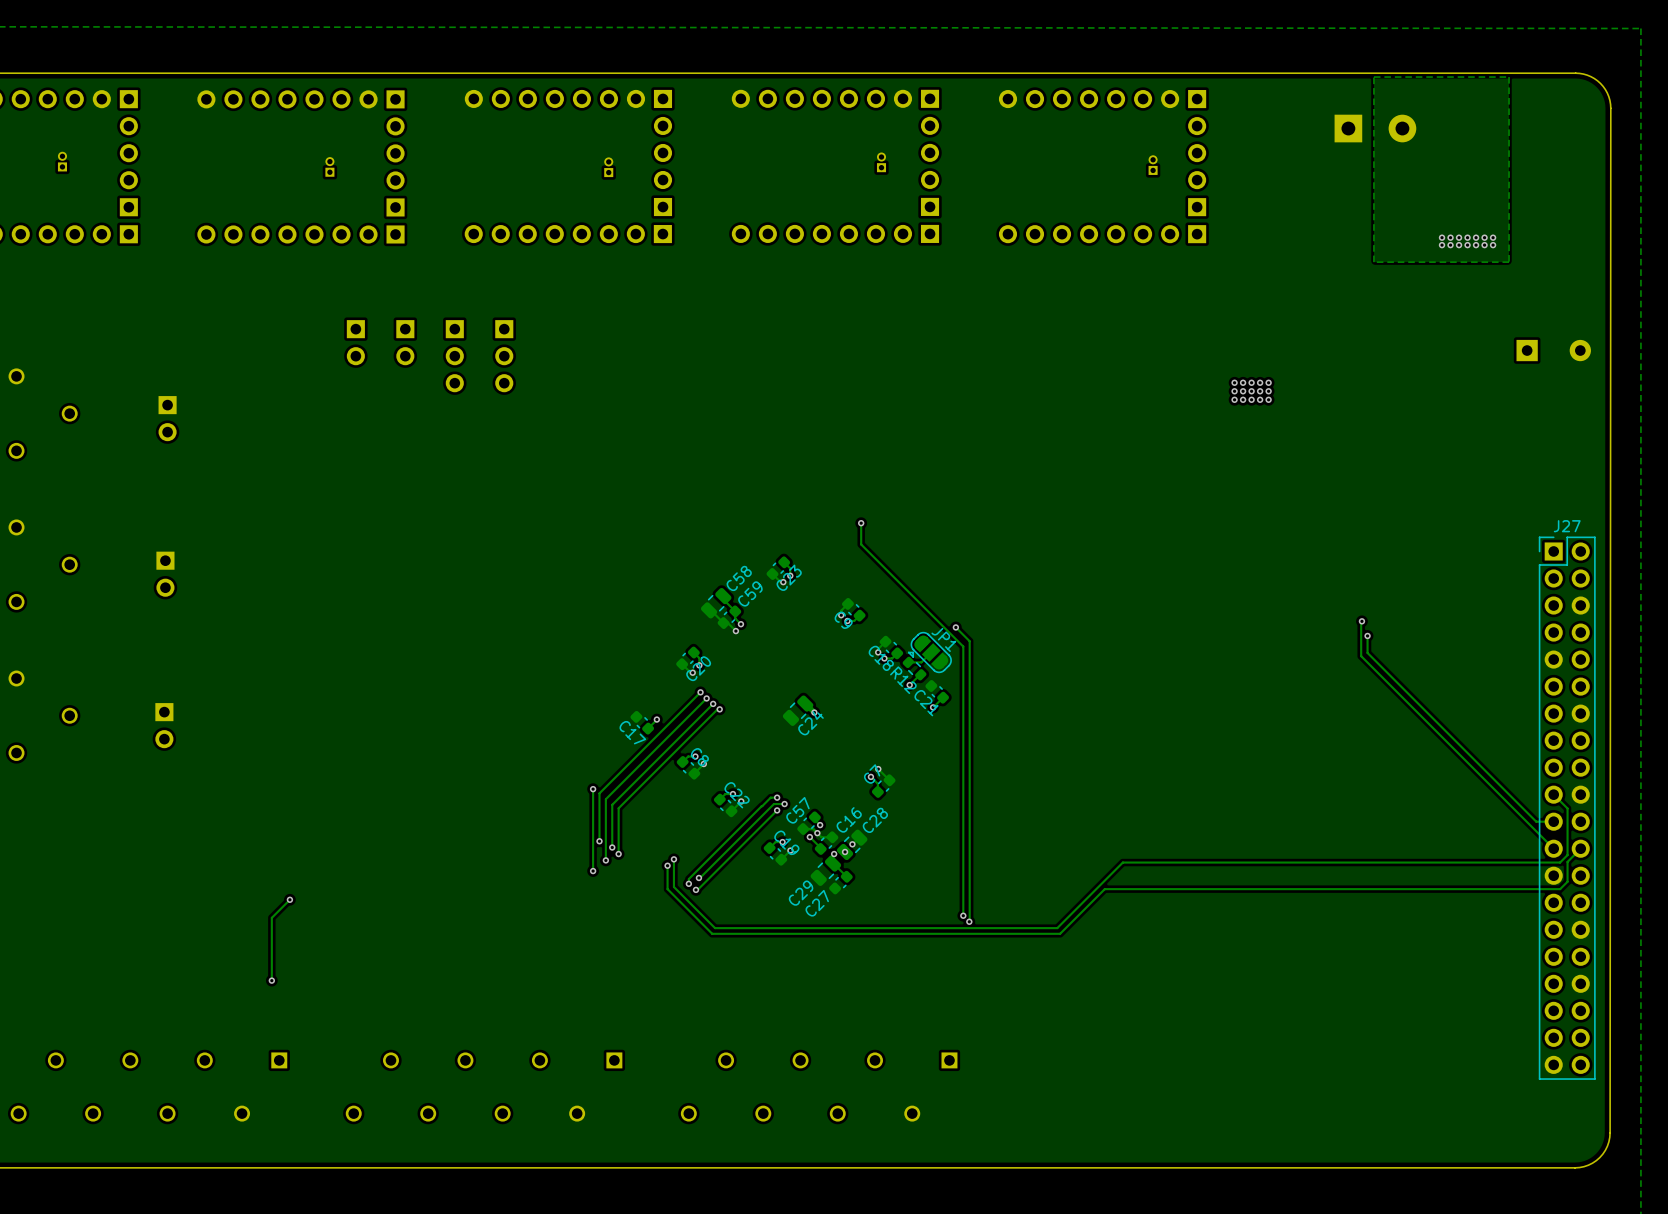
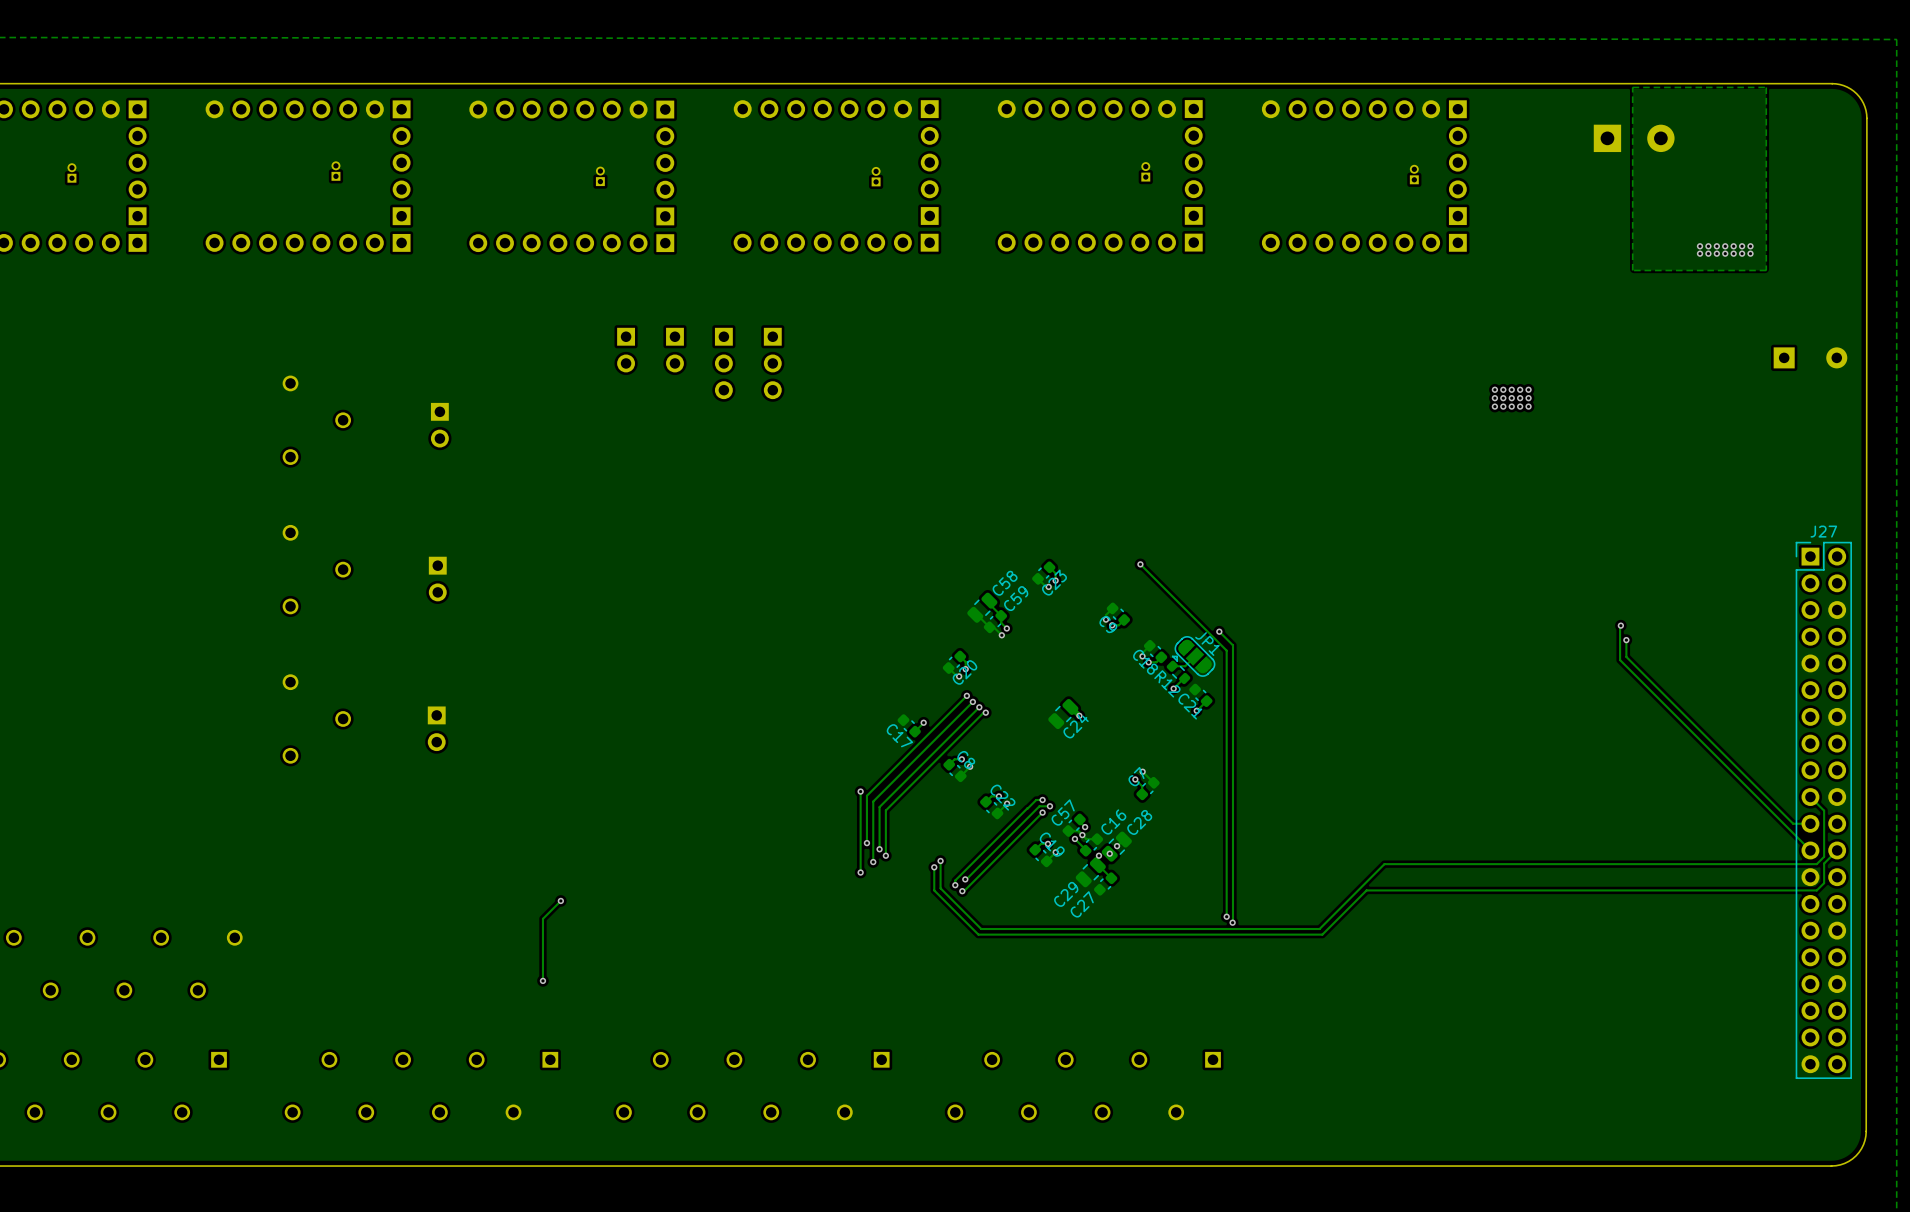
track: (861, 523) (861, 544) (876, 559) -> none
via position: (861, 523) -> (1140, 564)

